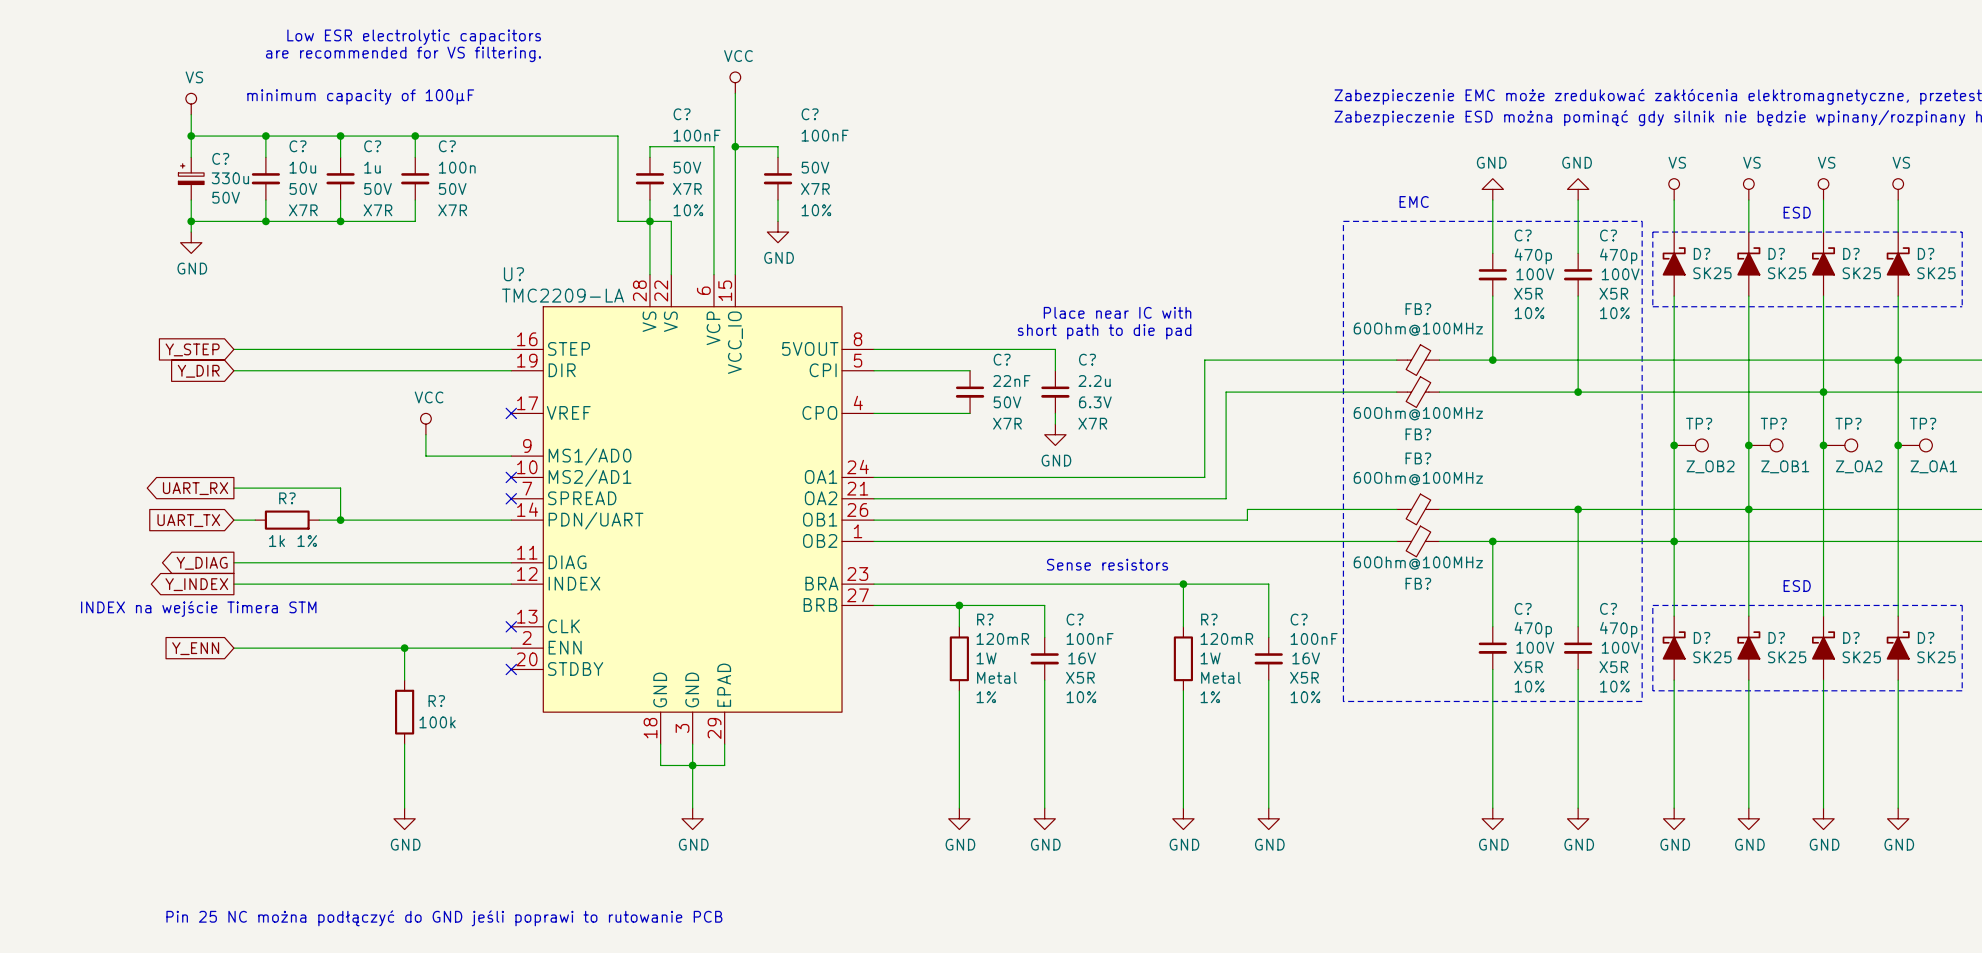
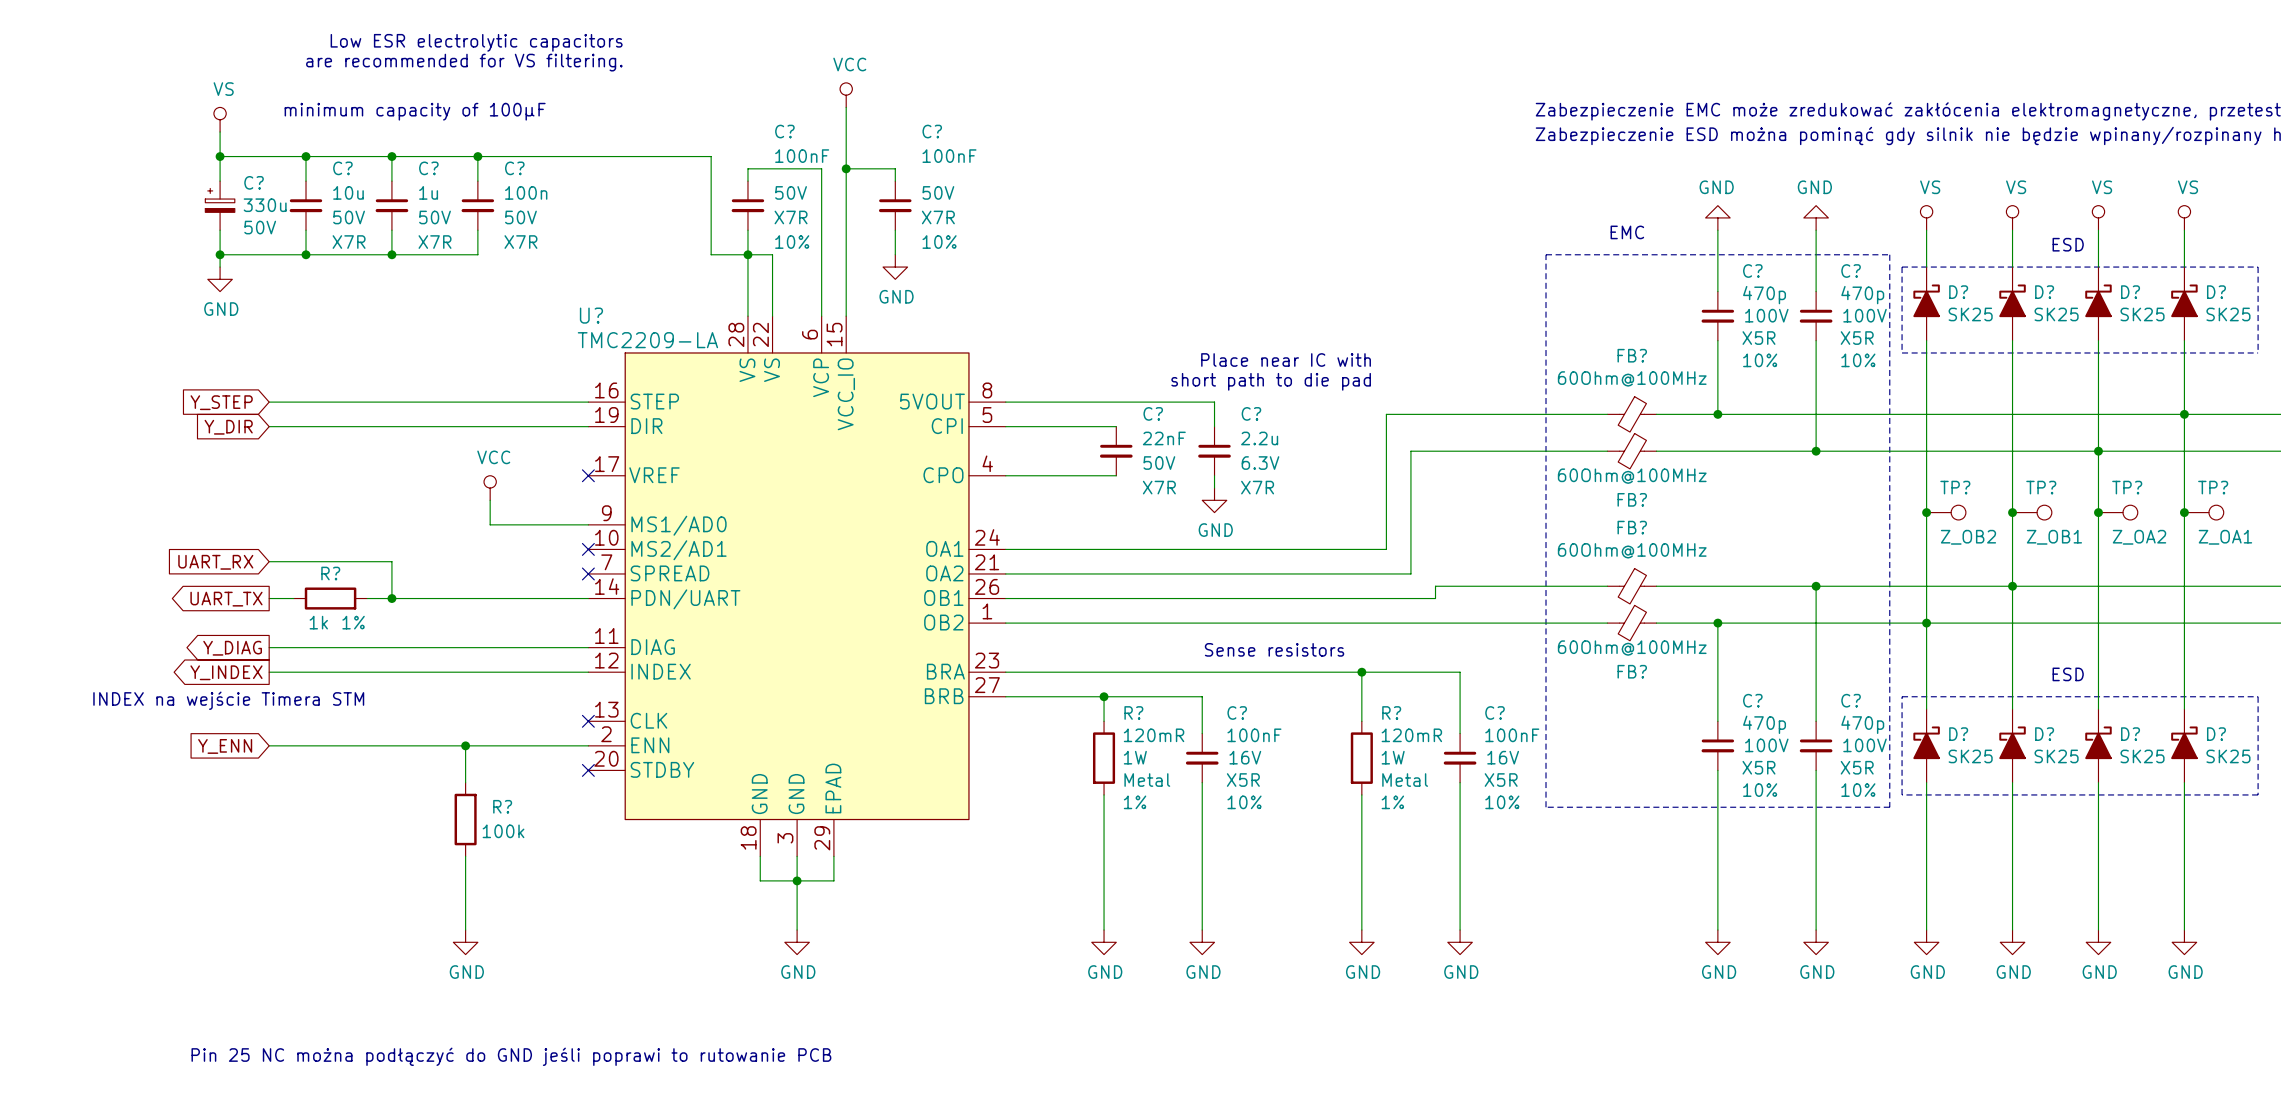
global label shape: output (195, 488) -> input (215, 562)
global label shape: input (188, 520) -> output (226, 599)

